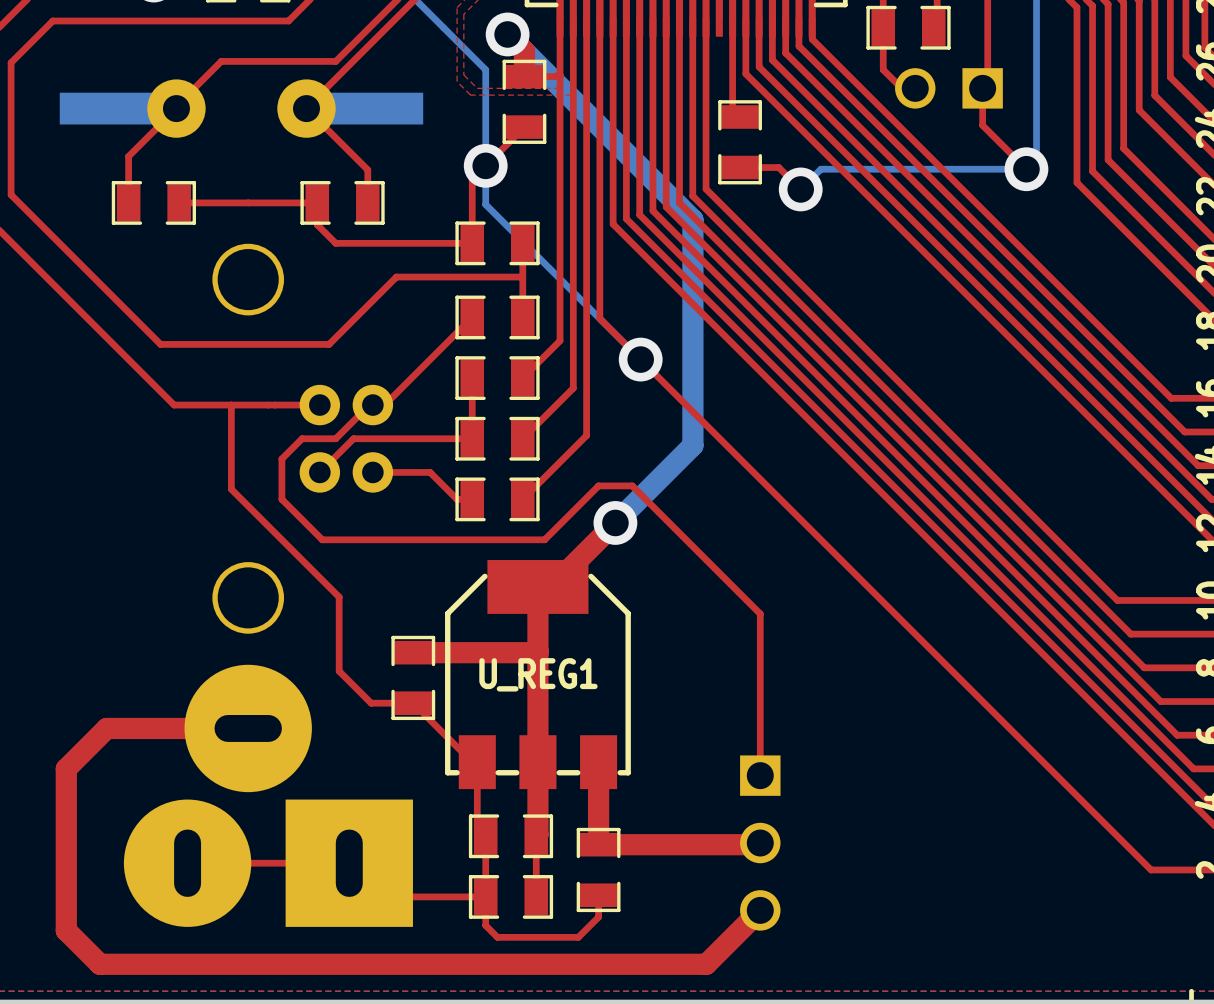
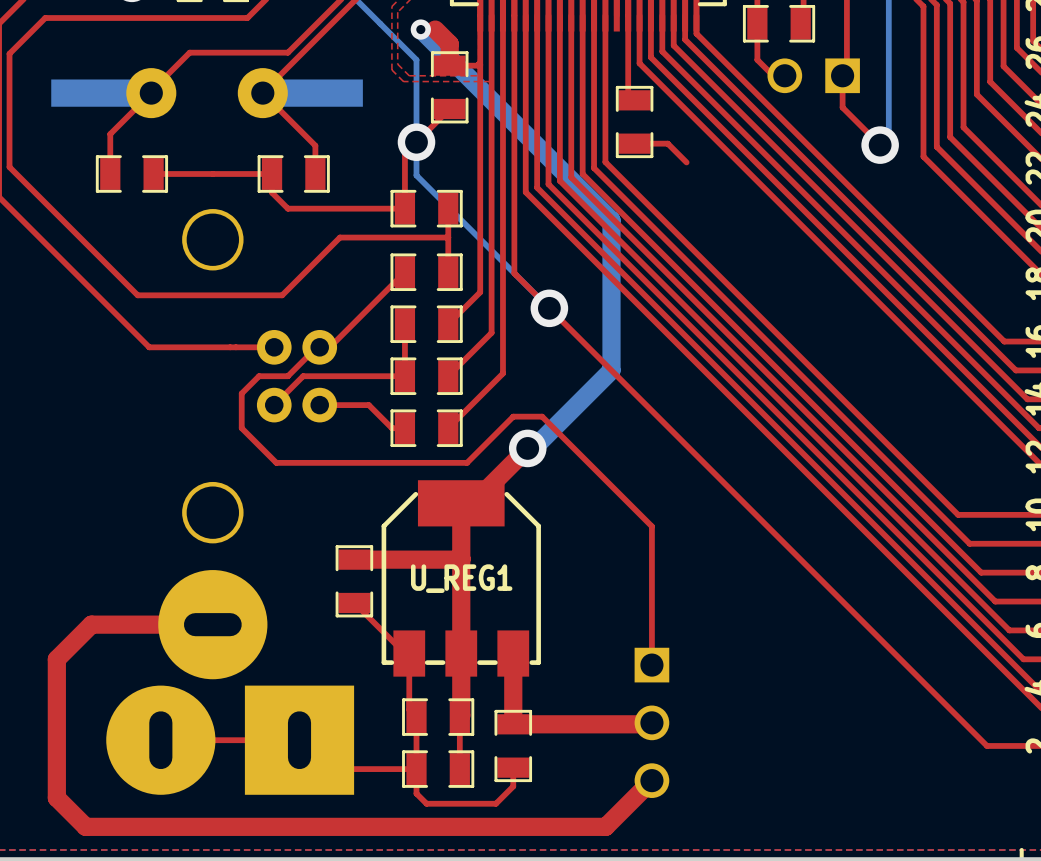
via size: [485, 12, 530, 57] -> [410, 19, 431, 40]
bottom track: none -> (420, 29) (611, 220) (611, 370) (530, 451)
bottom track: (507, 34) (692, 219) (692, 445) (615, 522) -> none
bottom track: (1026, 169) (820, 169) (800, 189) -> none
via: (800, 189) -> none
top track: (231, 405) (231, 489) (339, 597) (339, 671) (371, 703) (413, 703) -> none

